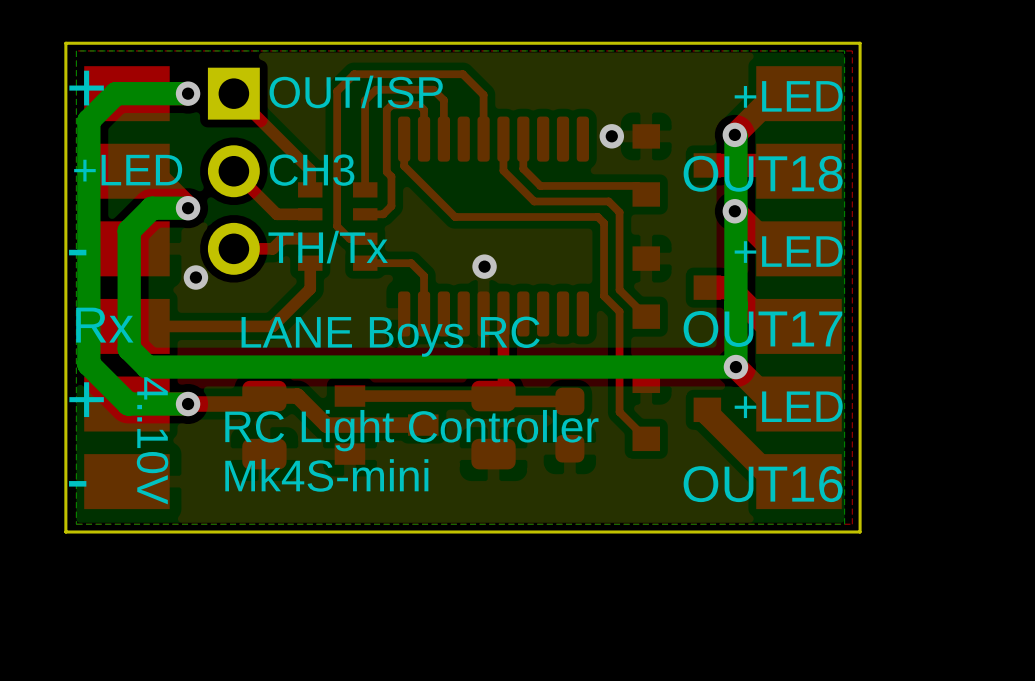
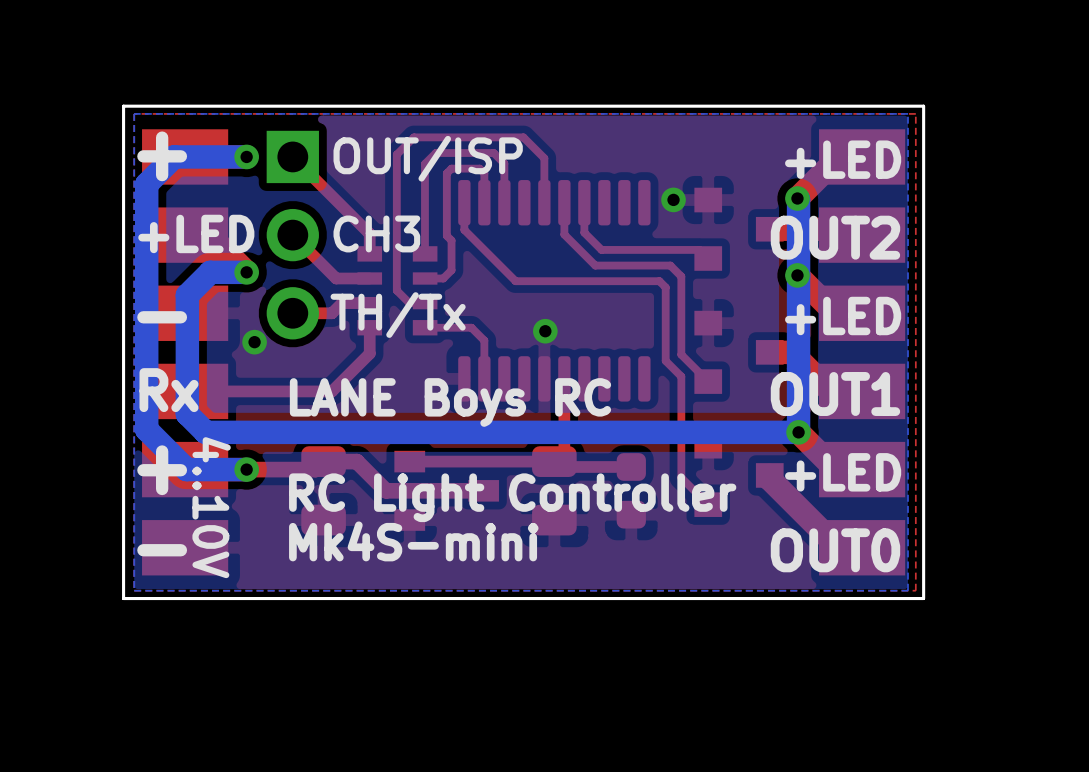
text: OUT18 (763, 173) -> OUT2 (835, 237)
text: OUT17 (762, 328) -> OUT1 (835, 393)
text: OUT16 (763, 484) -> OUT0 (835, 550)

